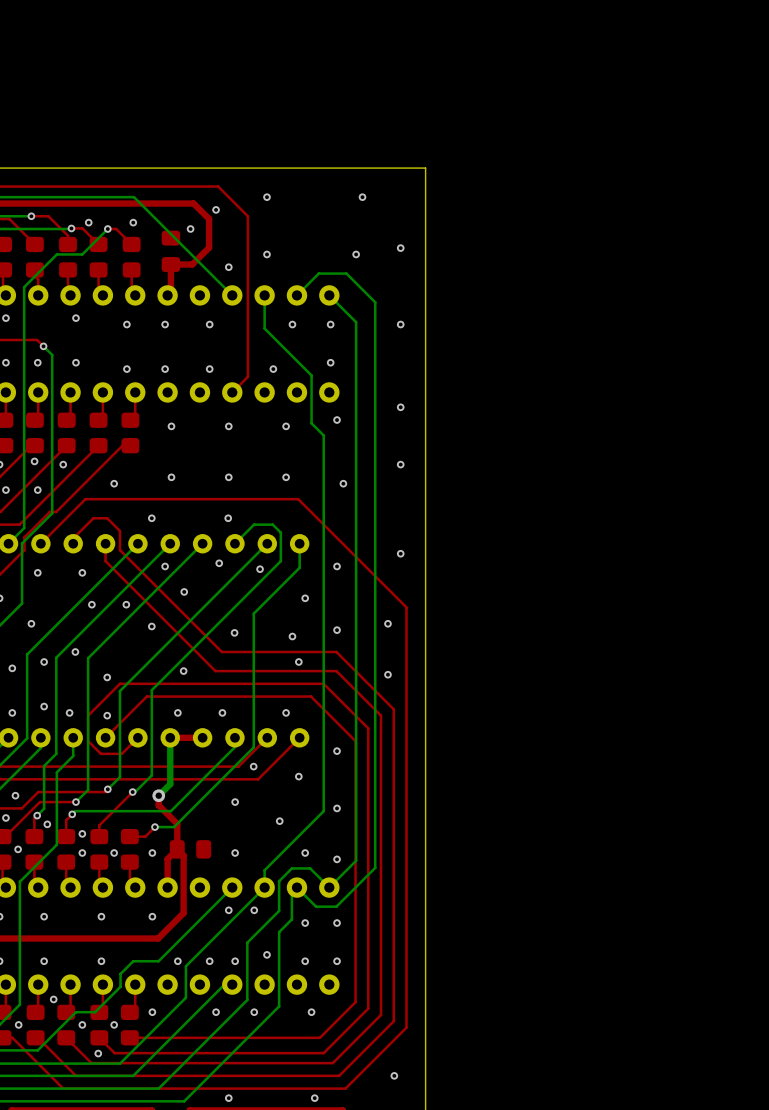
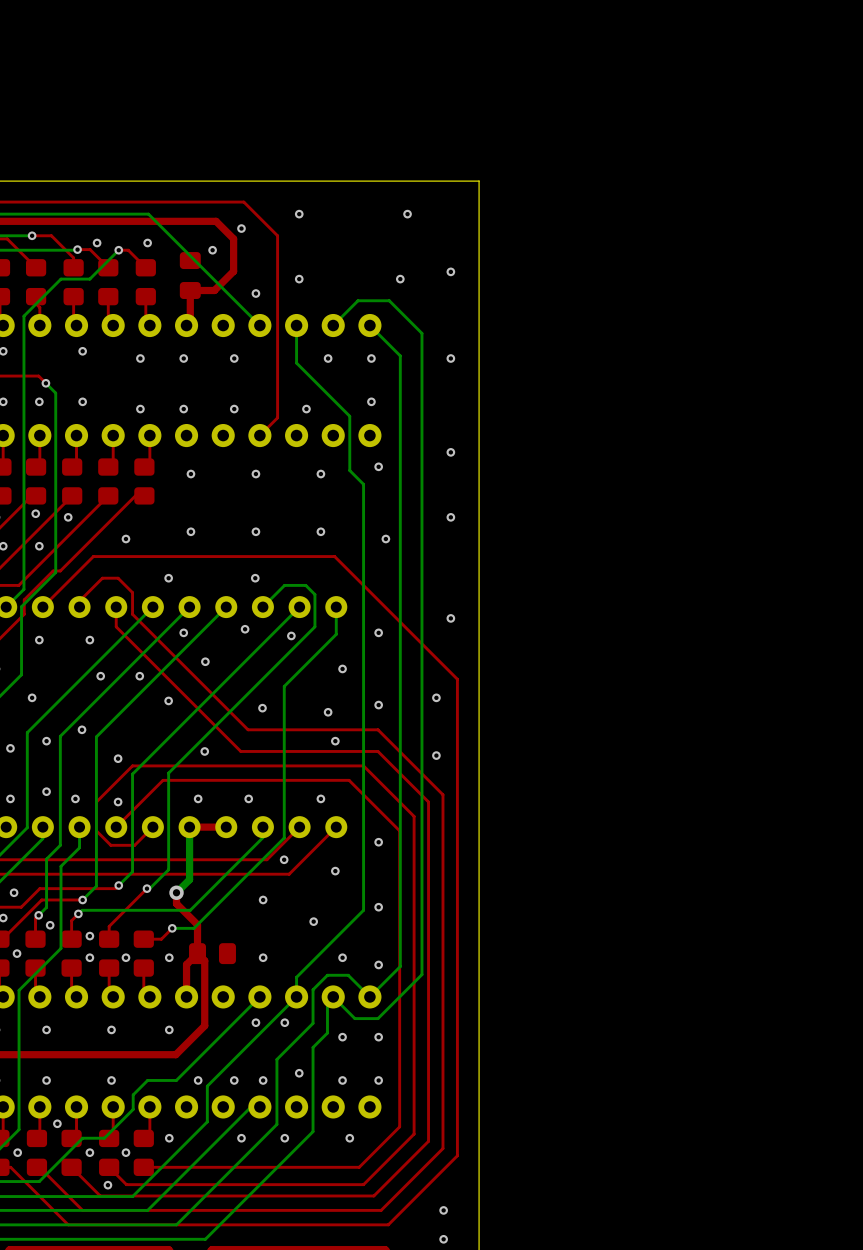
via: (228, 1098) -> none
via: (314, 1098) -> none
via: none -> (443, 1239)

